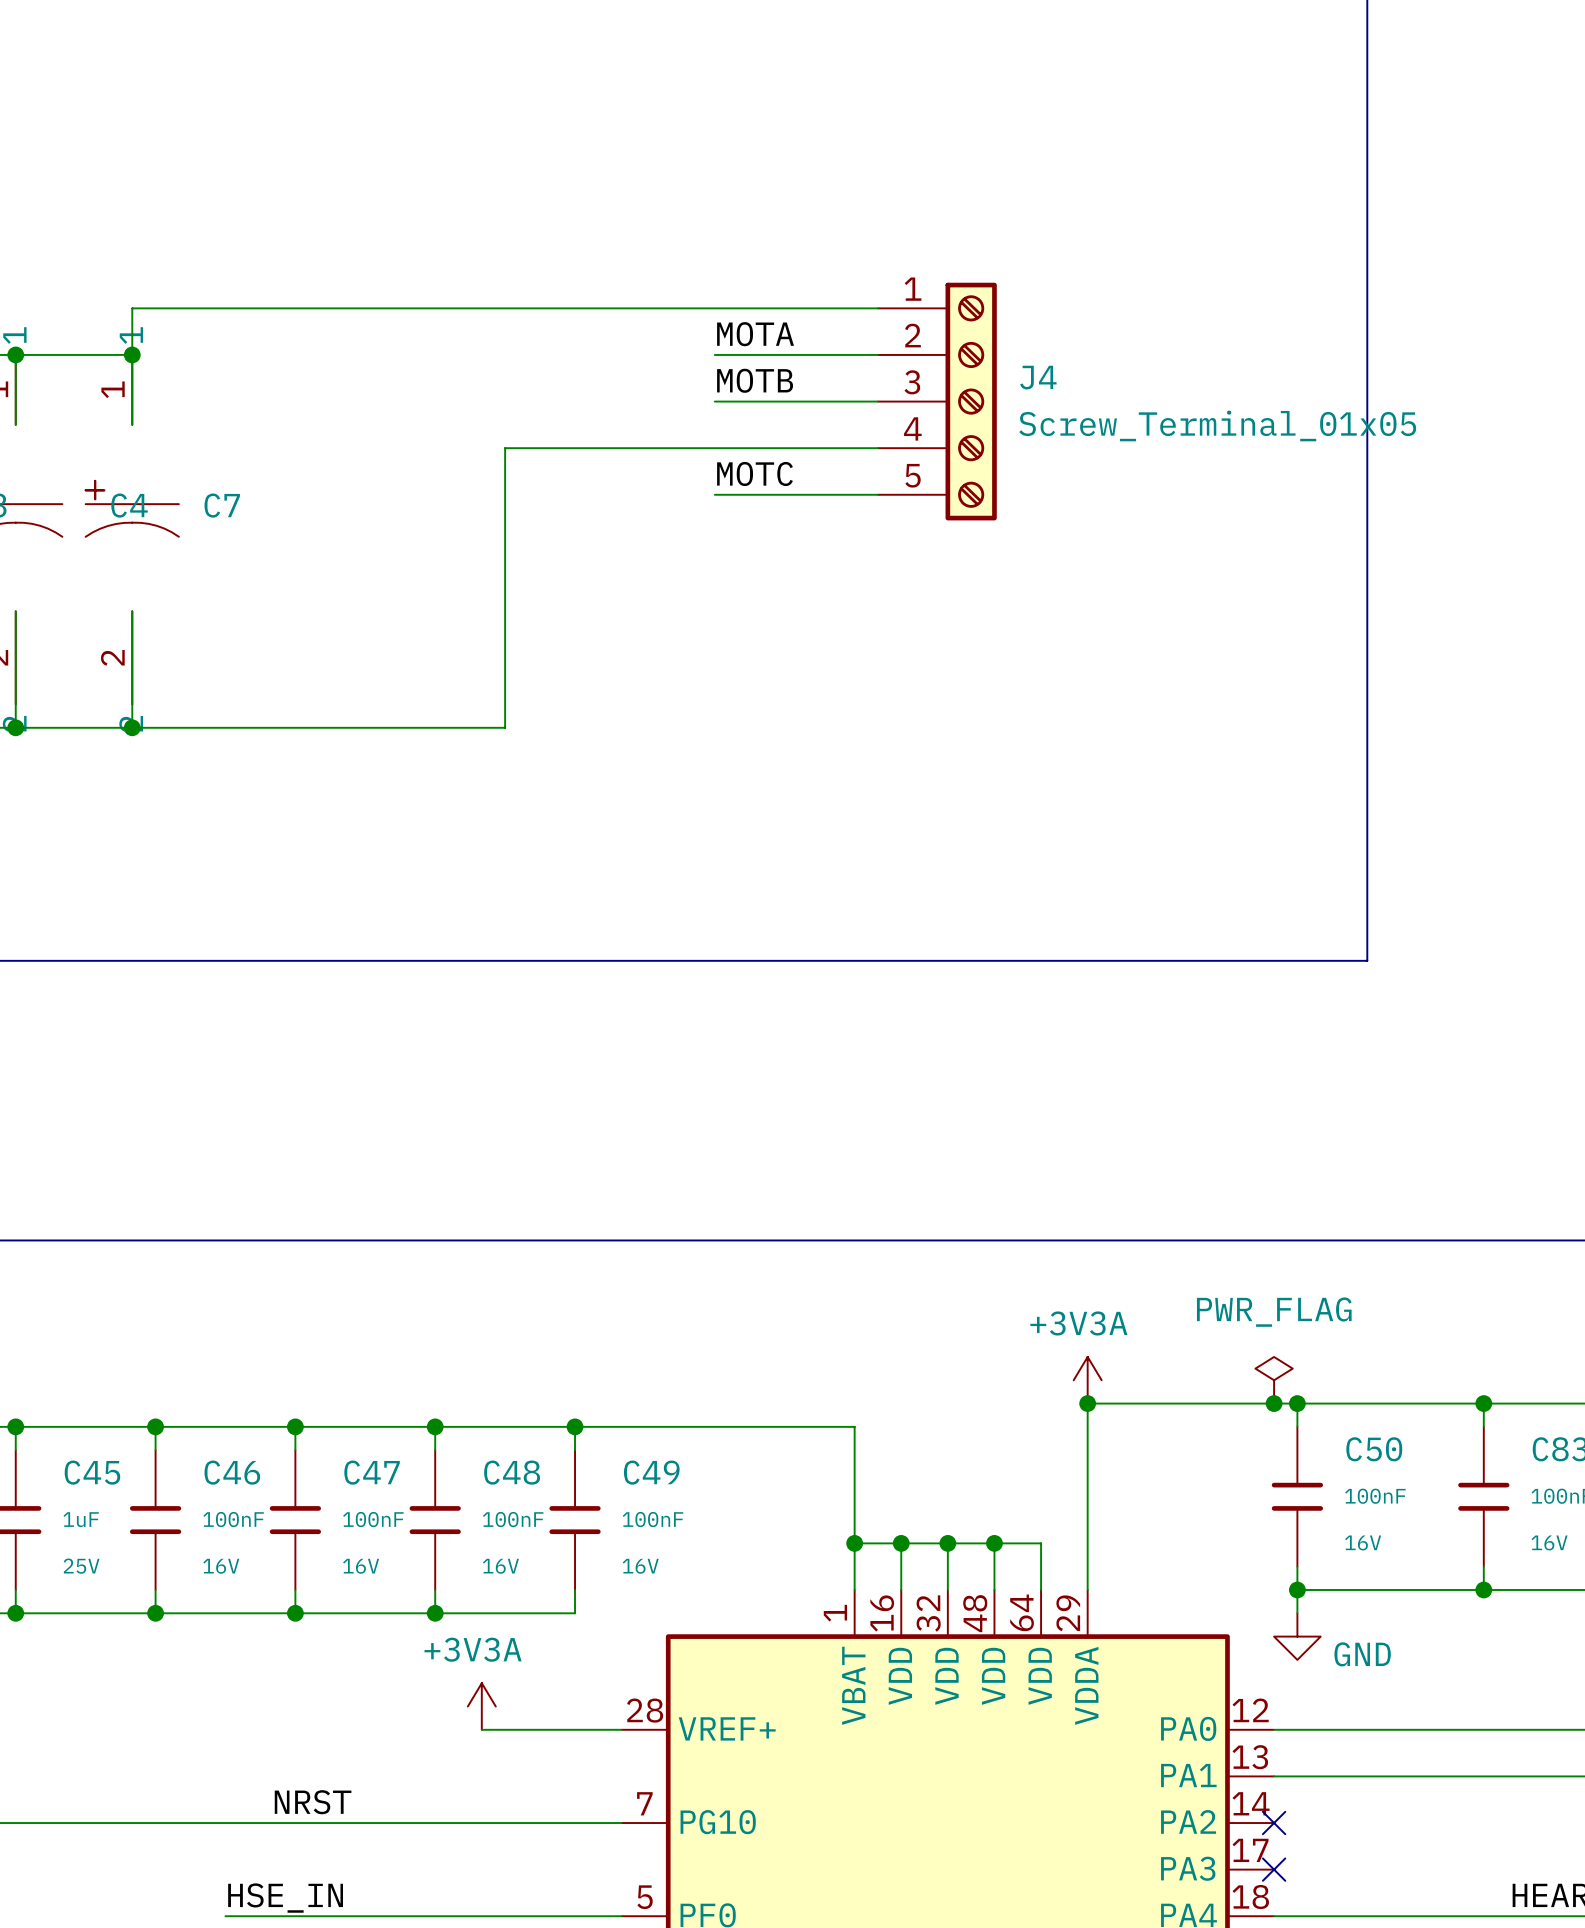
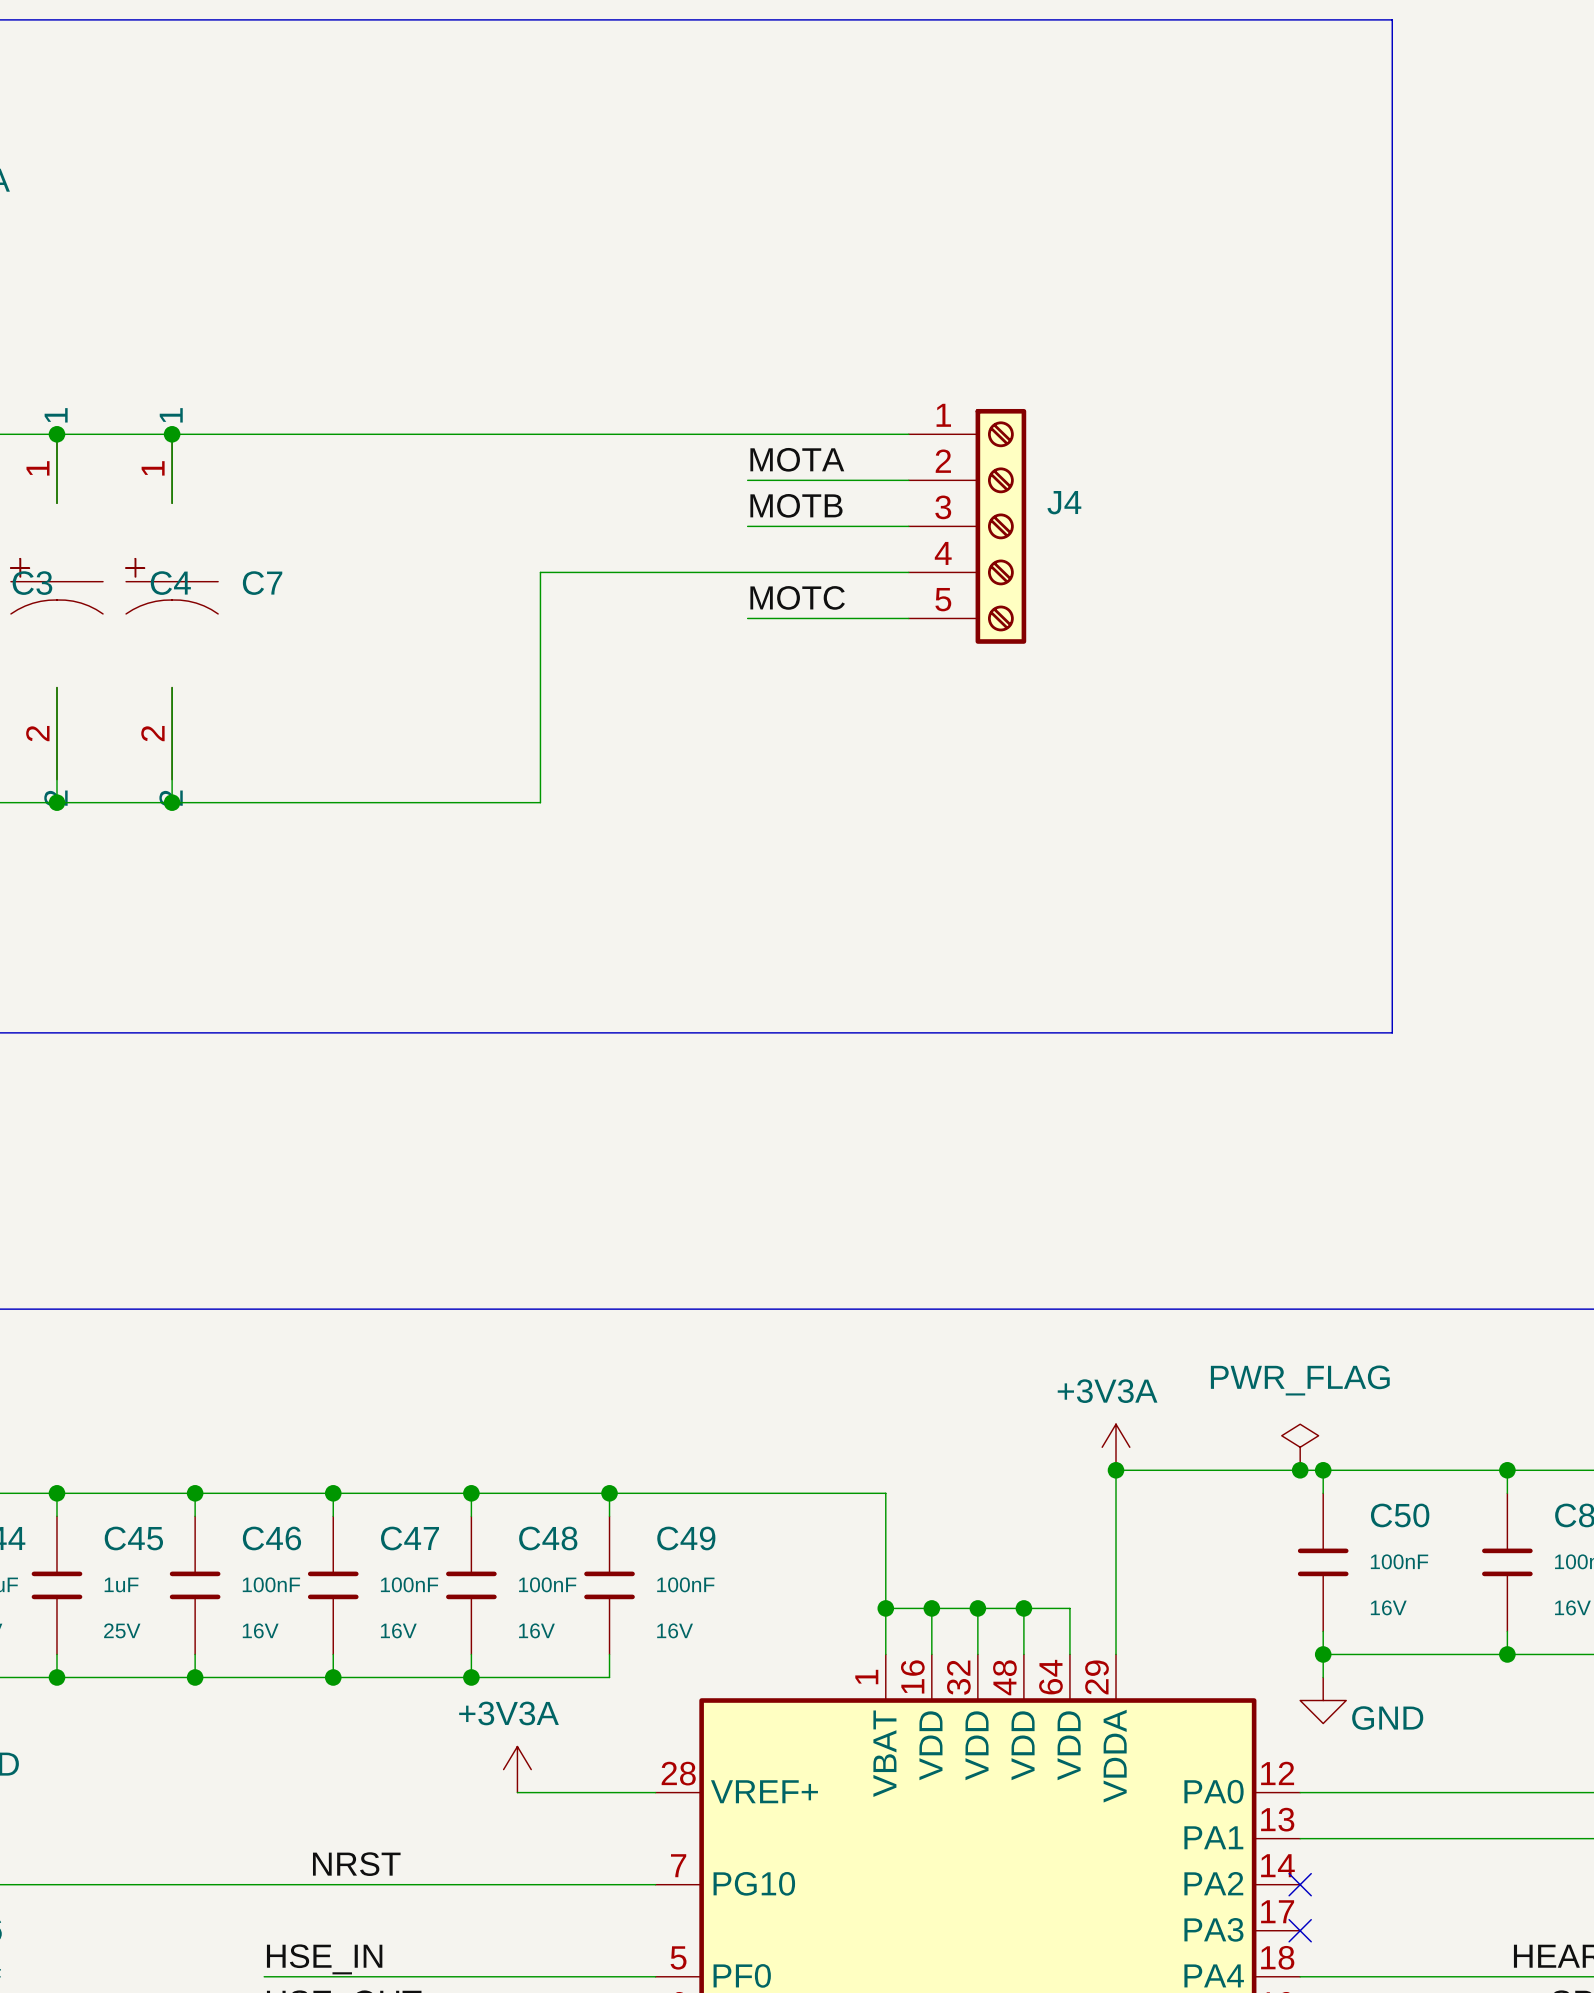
wire: (877, 308) (132, 308) (132, 354) -> (747, 434) (172, 434)
label: MOTA (755, 334) -> none
label: MOTB (755, 380) -> MOTA (797, 459)
J4 position: (937, 401) -> (967, 526)
J4 value: Screw_Terminal_01x05 (1217, 425) -> none
label: none -> MOTB (796, 505)
wire: (714, 448) (505, 448) (505, 494) -> (747, 572) (540, 572)
label position: MOTC (755, 473) -> MOTC (797, 597)
wire: none -> (747, 618) (908, 618)

